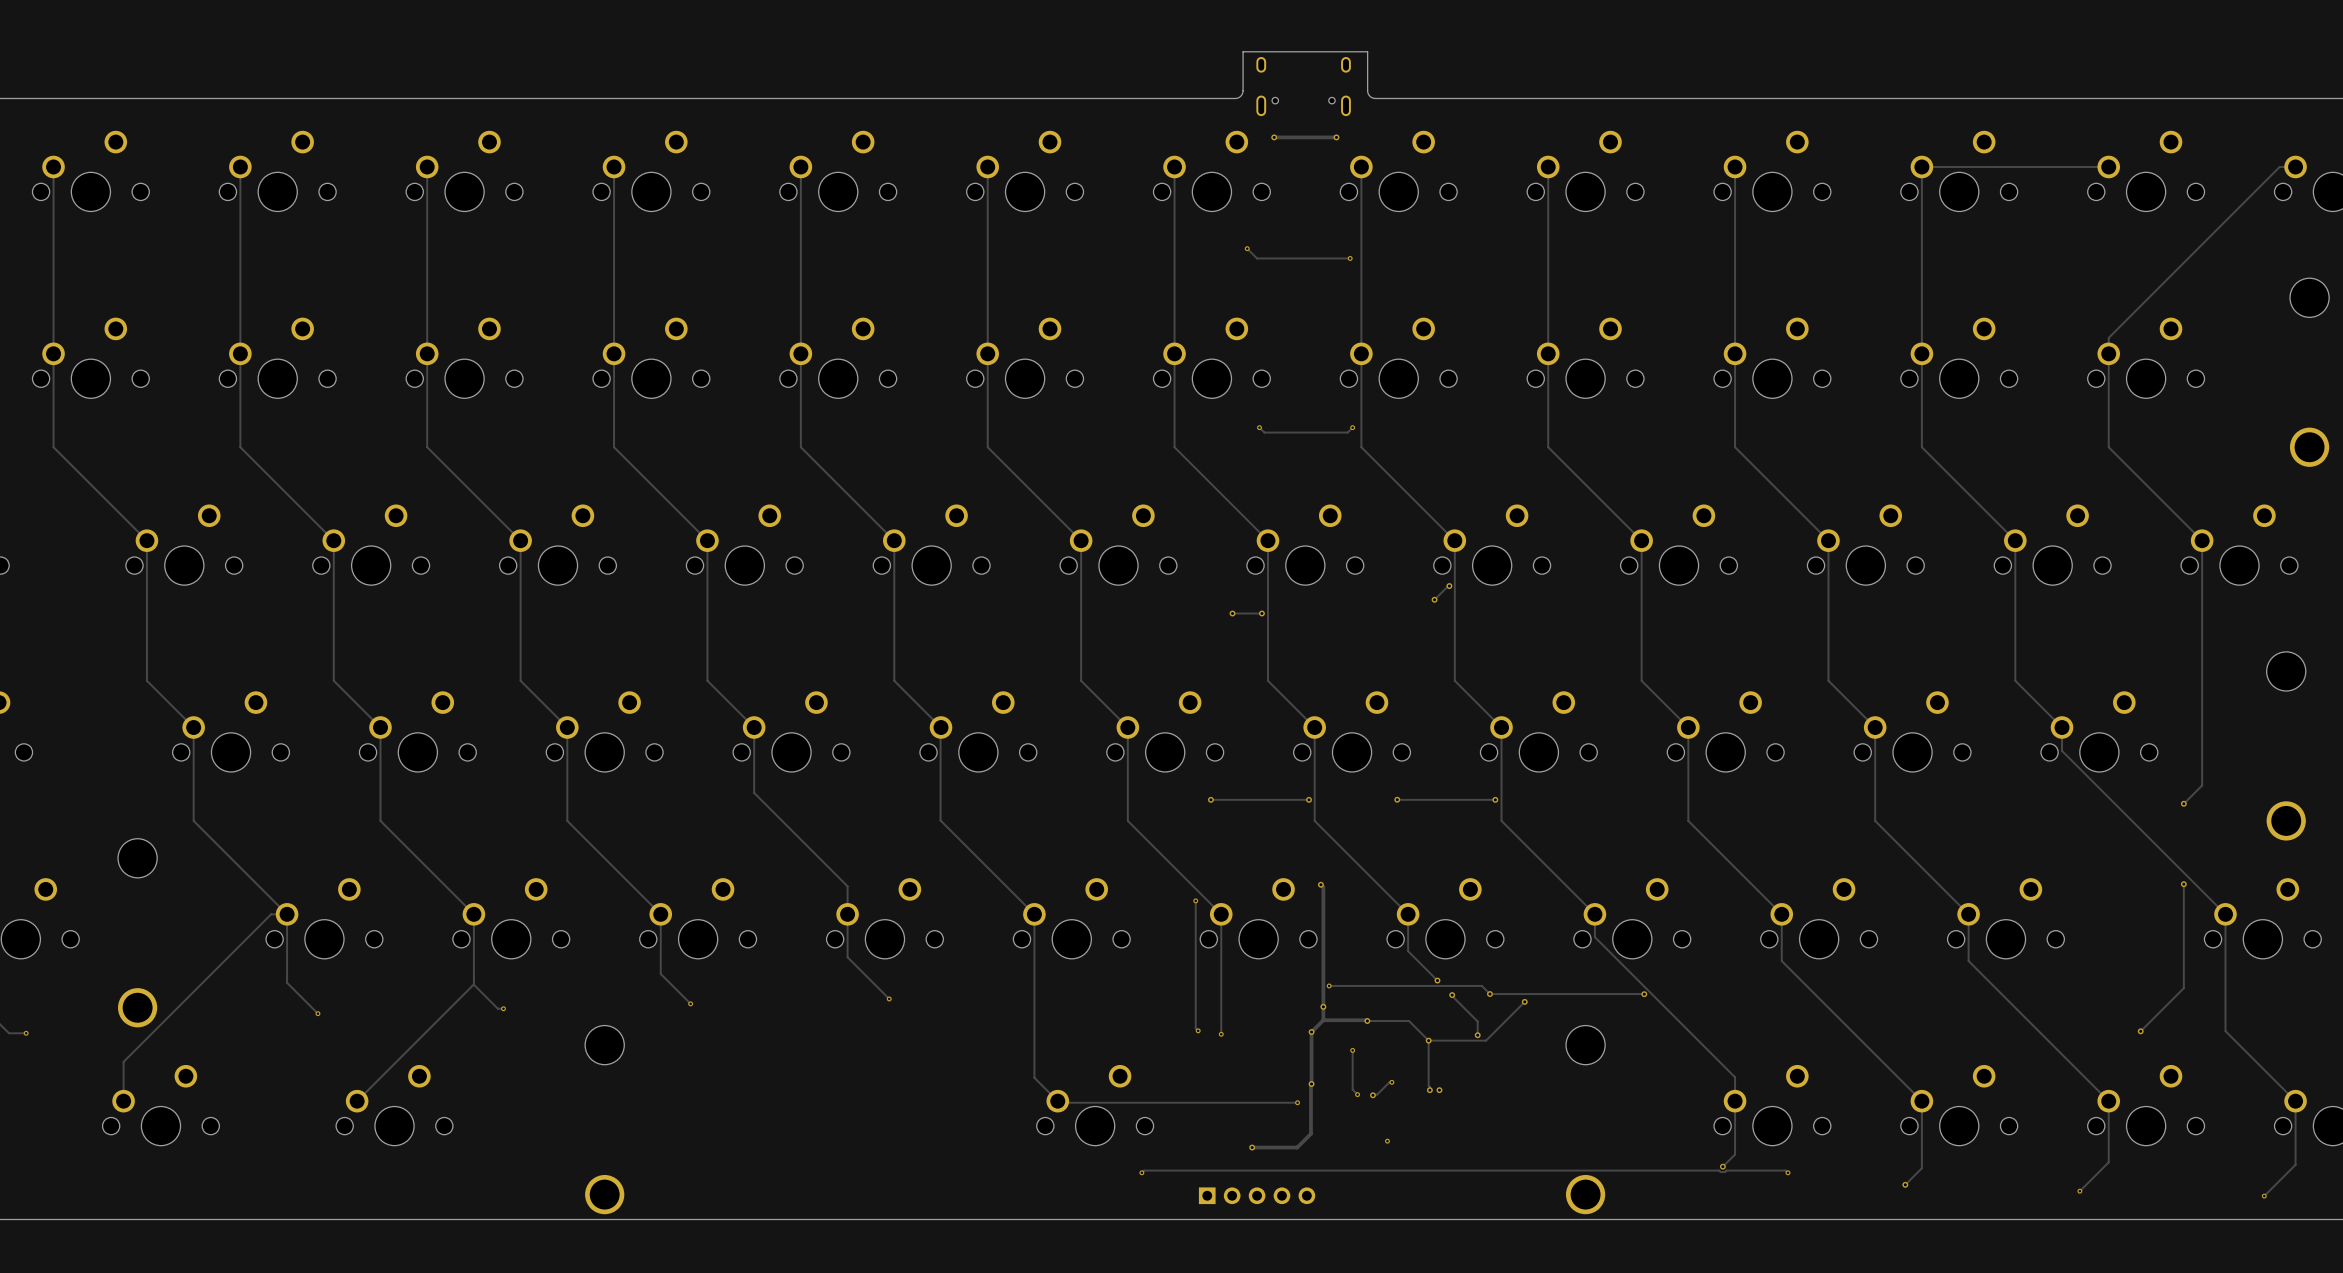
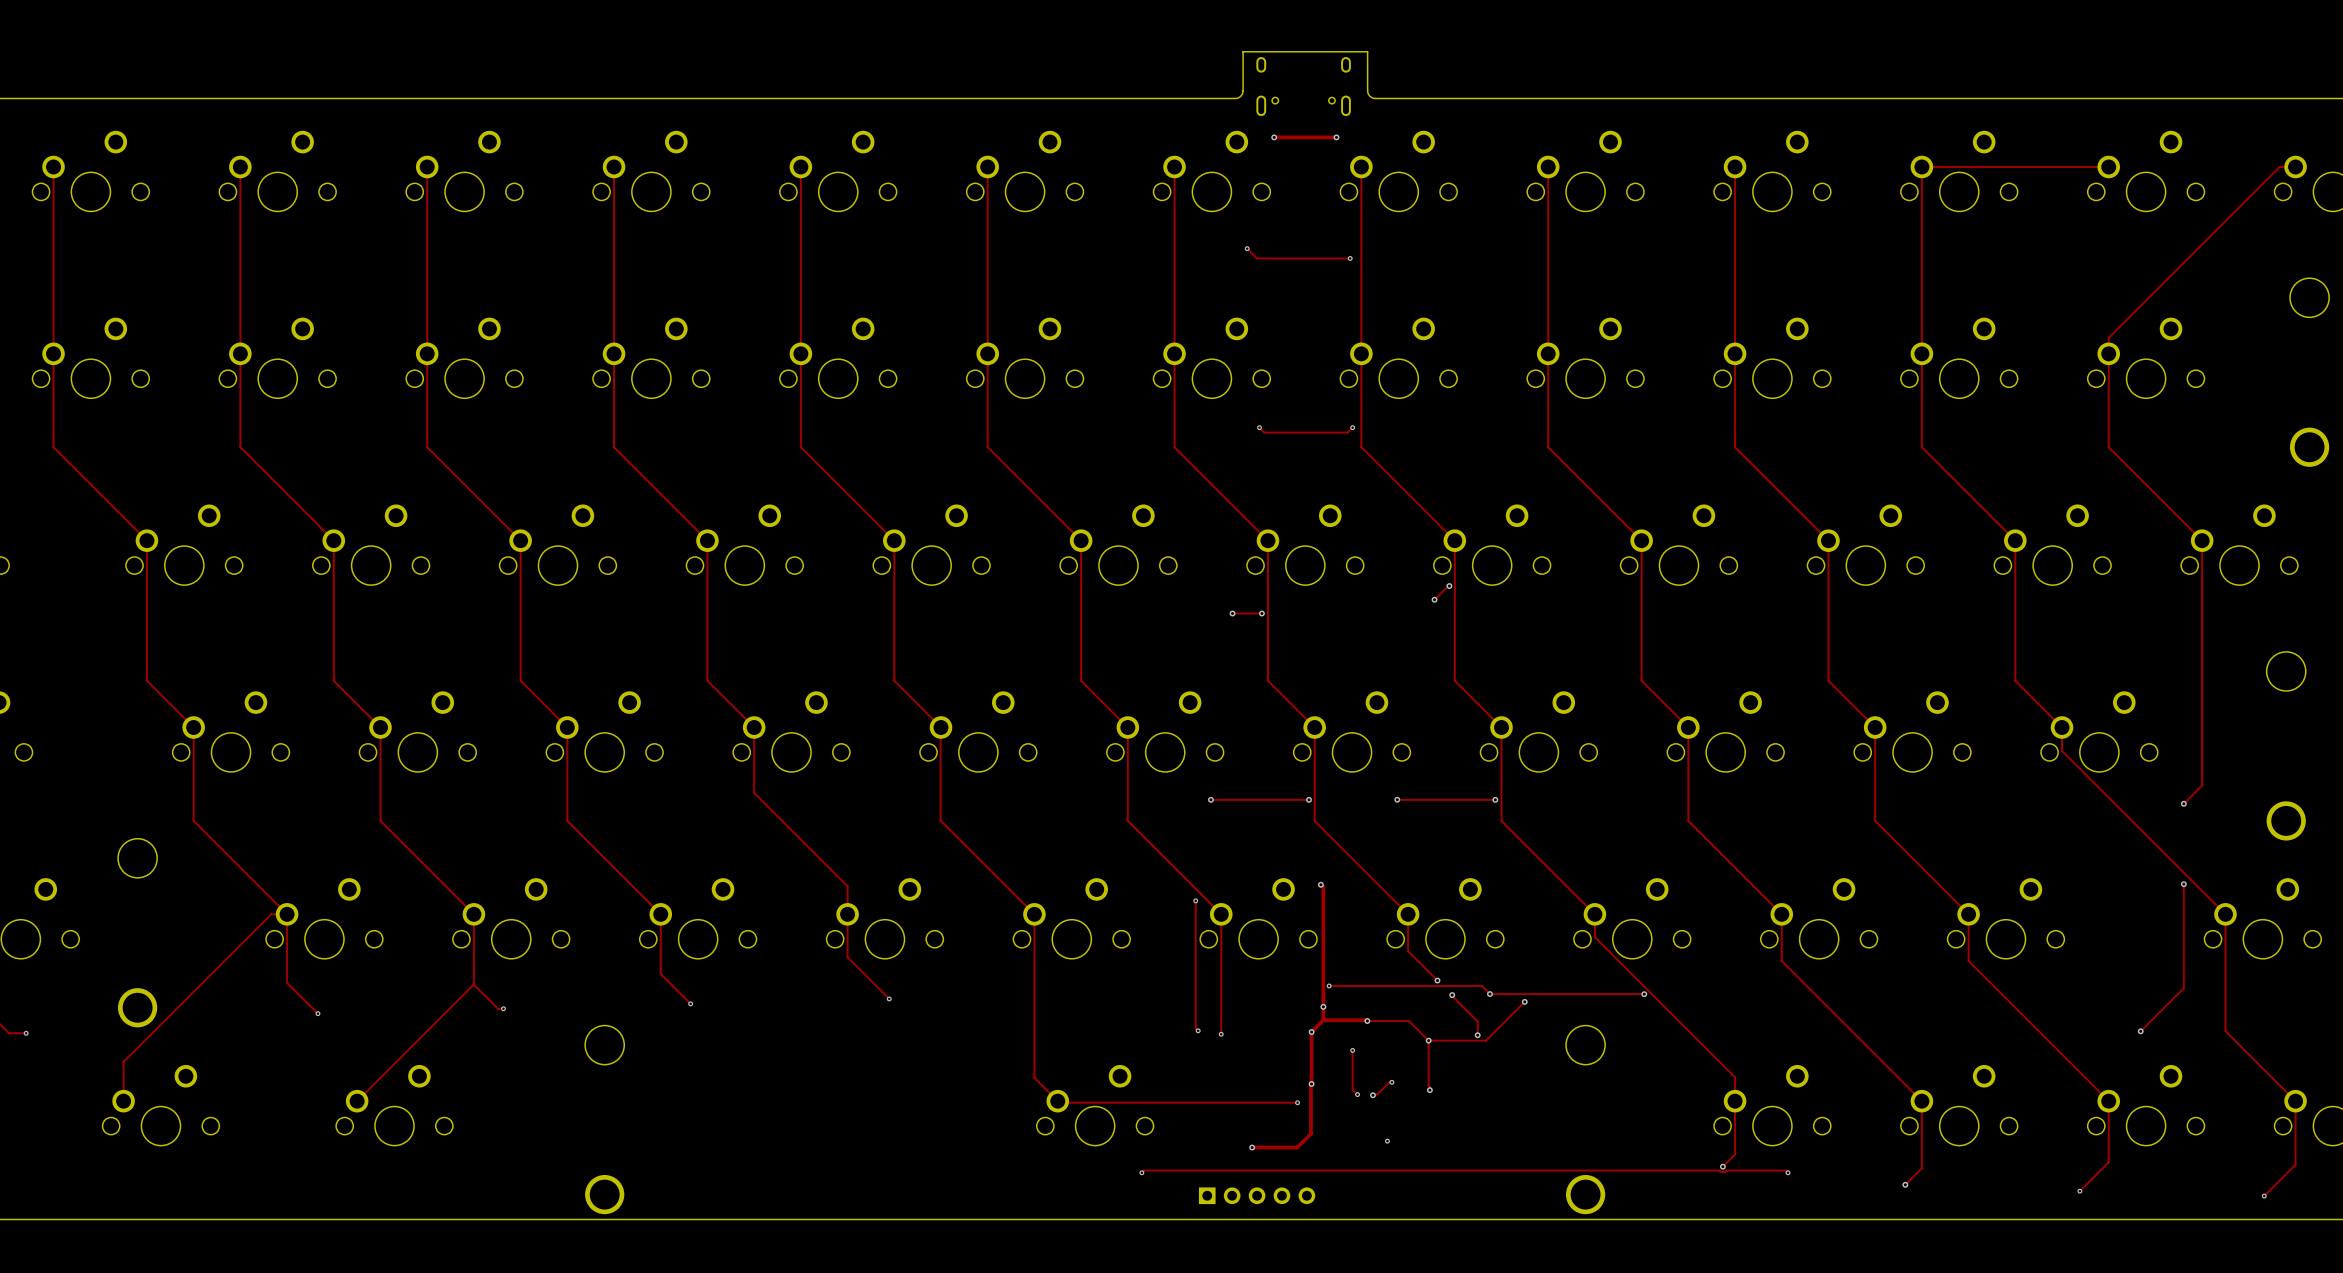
via: (1439, 1090) -> none

